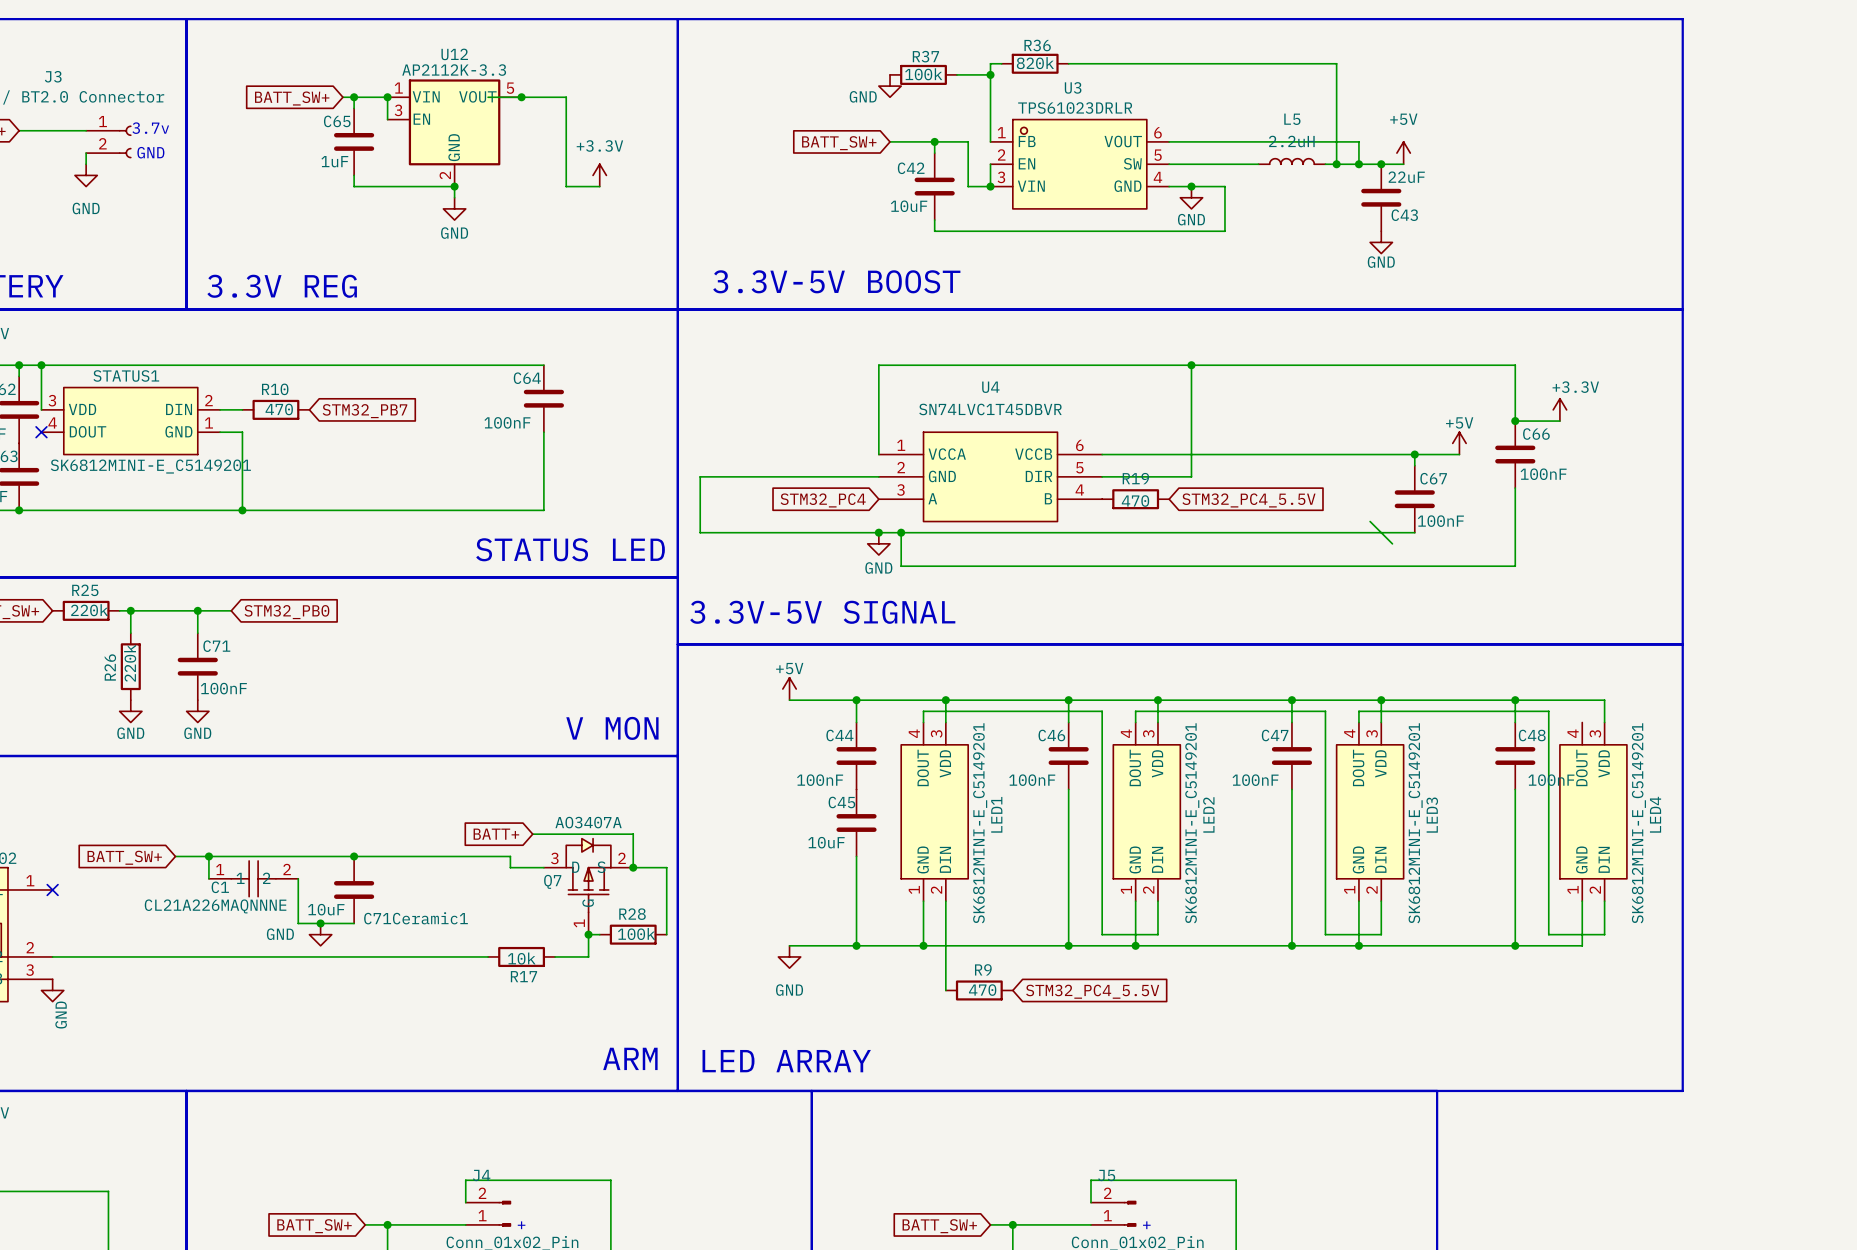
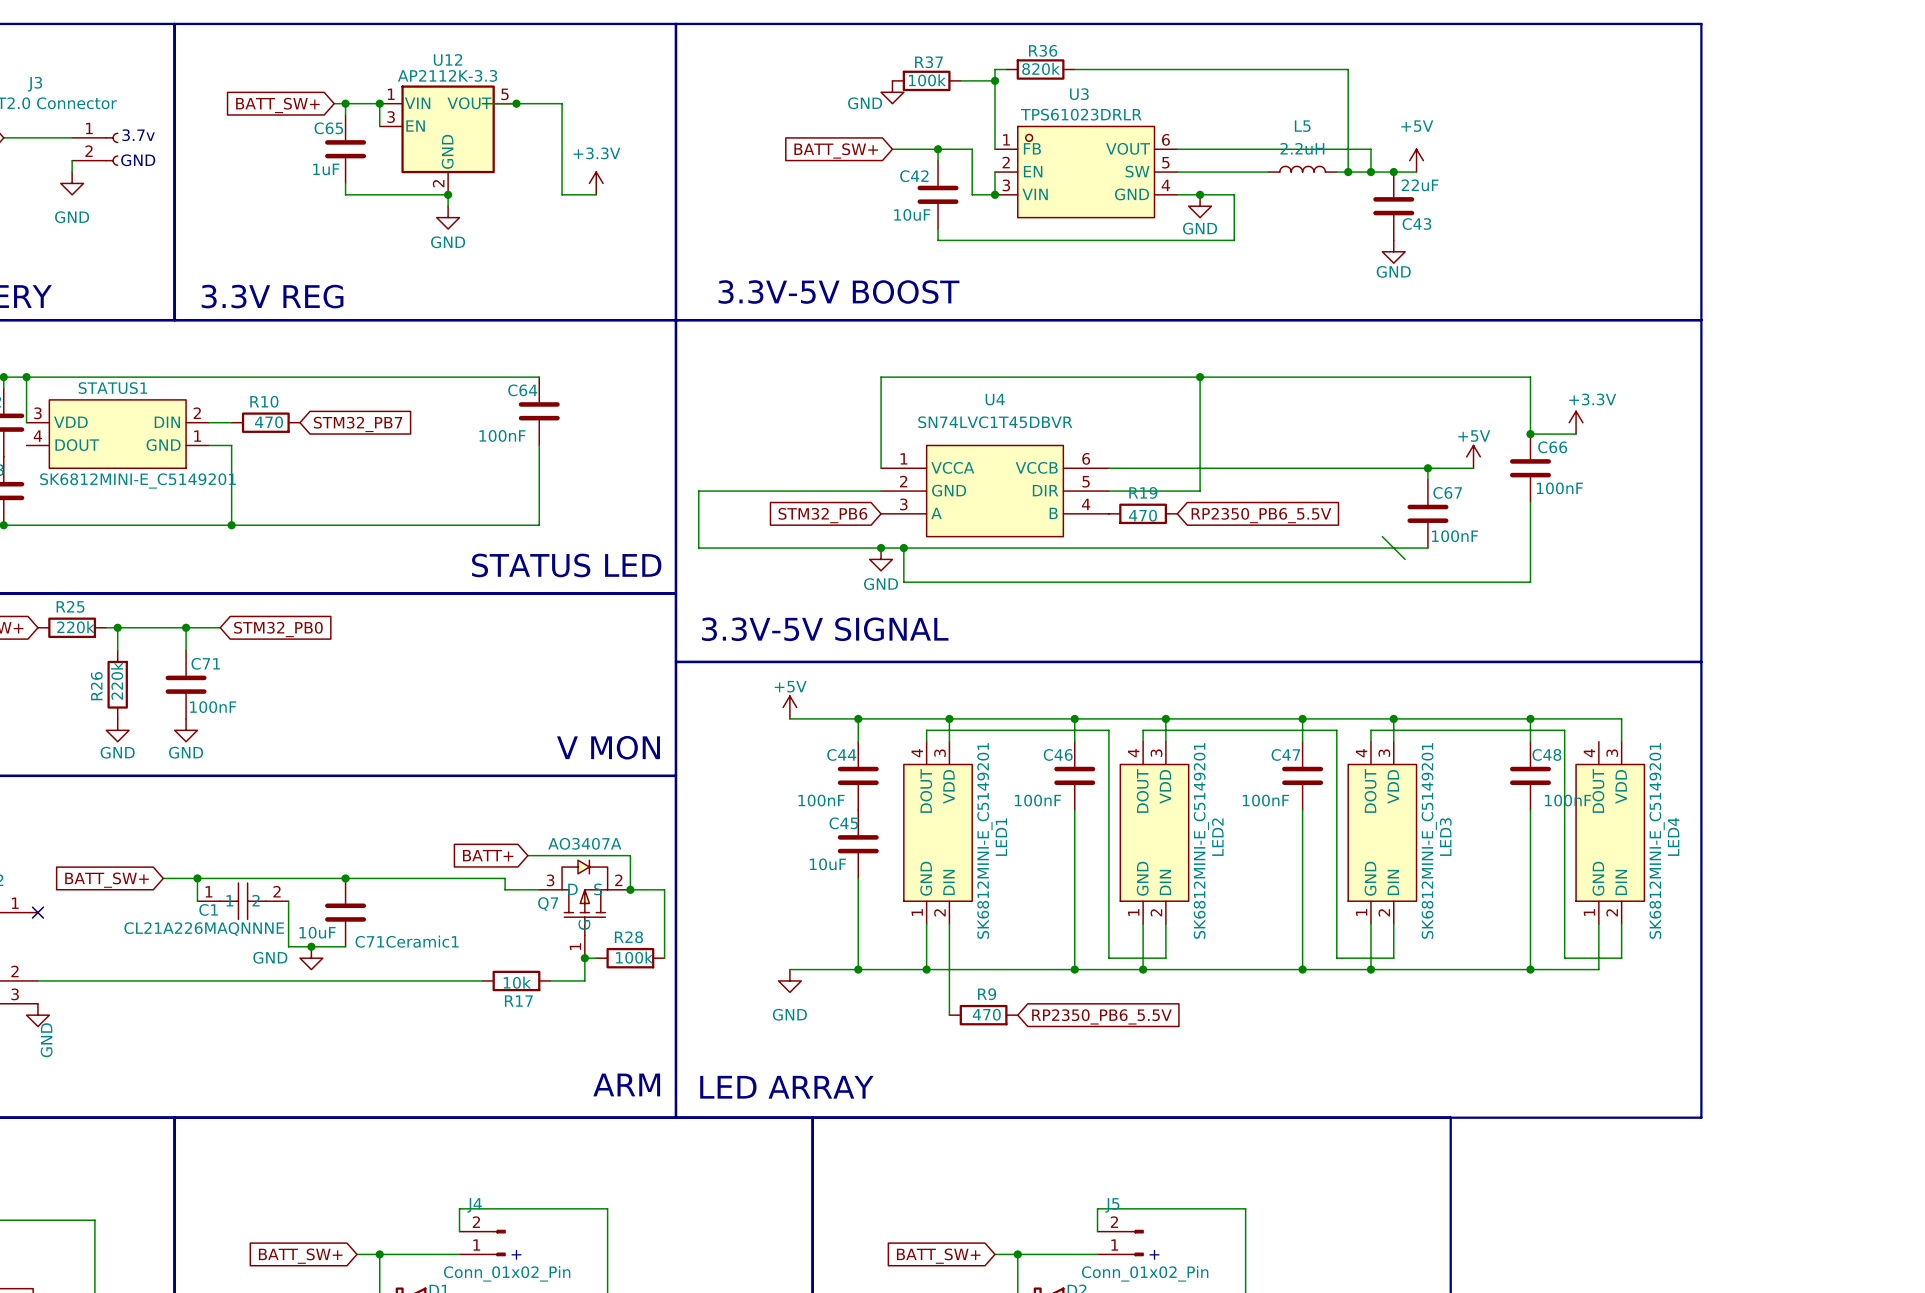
no-connect mark: (41, 432) -> none
global label: STM32_PC4 (823, 500) -> STM32_PB6 (822, 515)
global label: STM32_PC4_5.5V (1248, 500) -> RP2350_PB6_5.5V (1261, 515)
global label: STM32_PC4_5.5V (1092, 991) -> RP2350_PB6_5.5V (1101, 1016)

